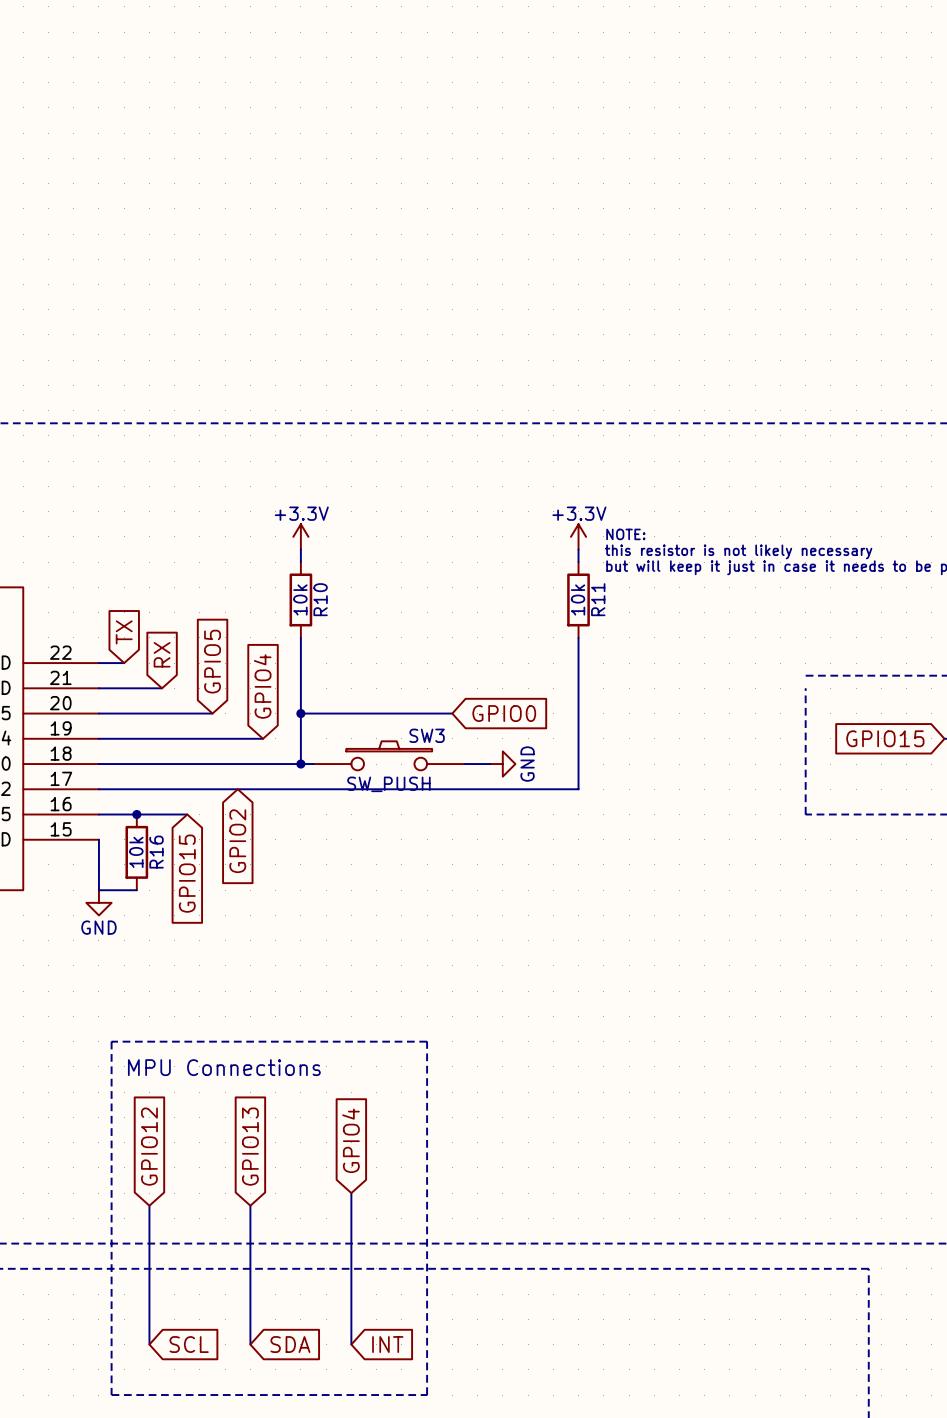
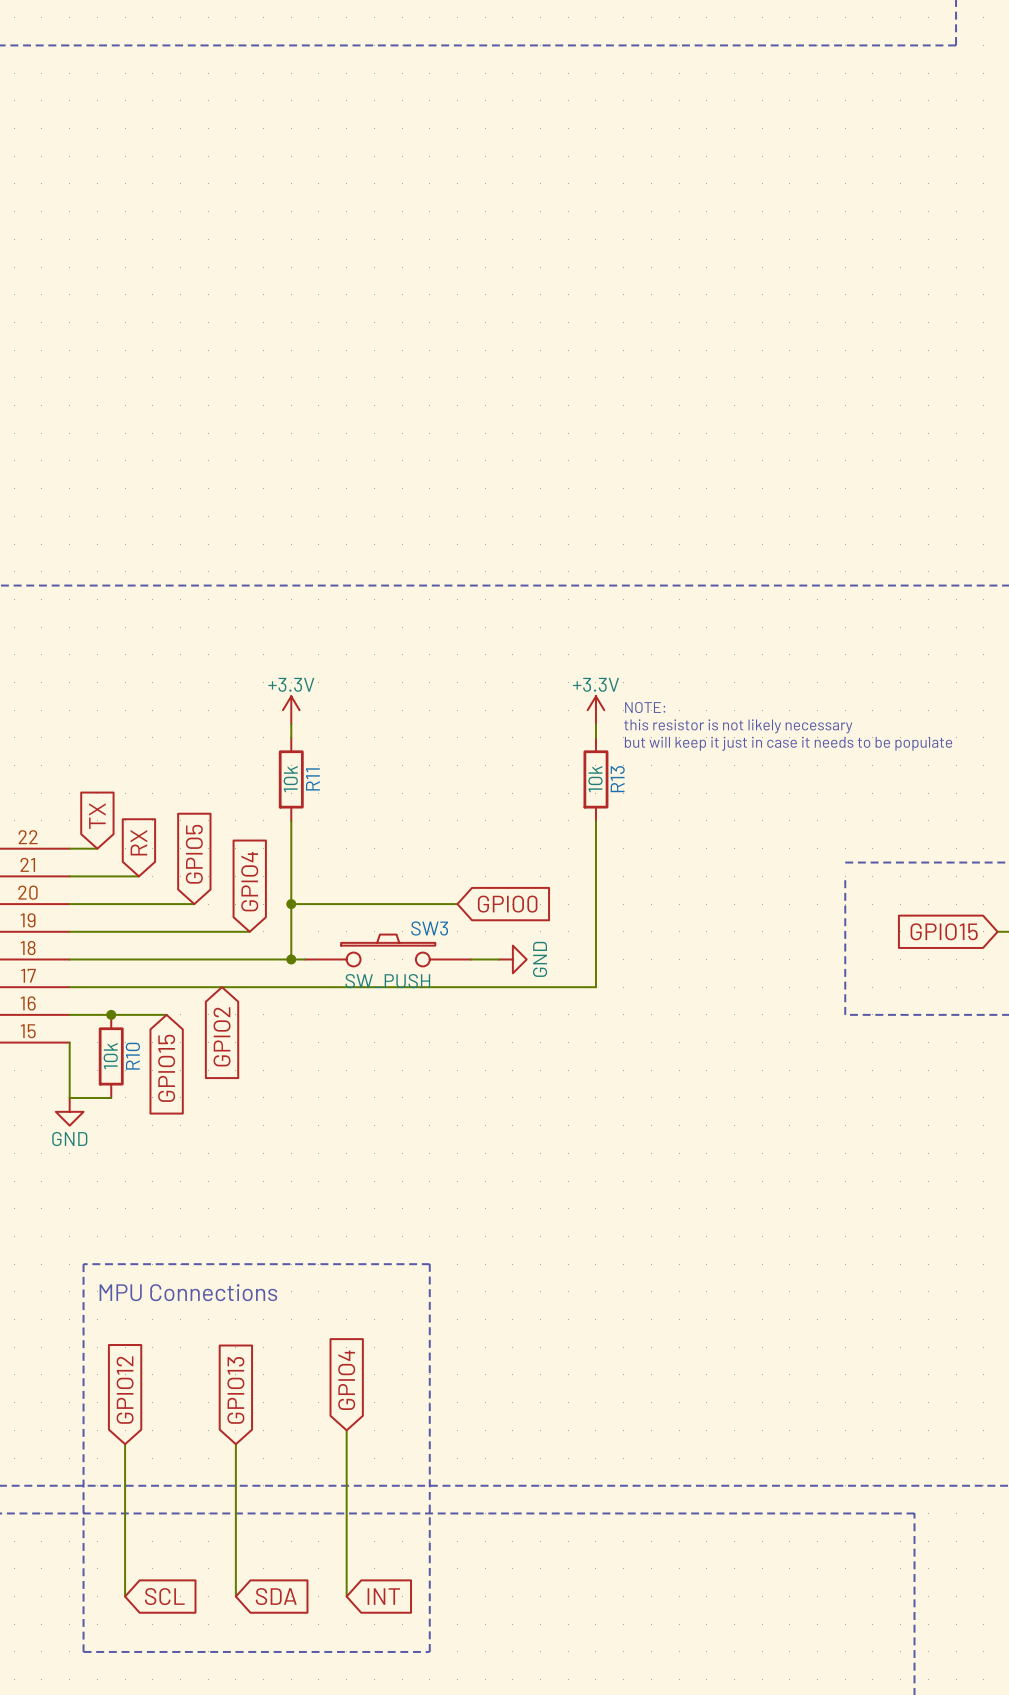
R10 name: R10 (320, 599) -> R11 (312, 779)
R11 name: R11 (598, 599) -> R13 (617, 779)
R16 name: R16 (156, 852) -> R10 (132, 1056)

